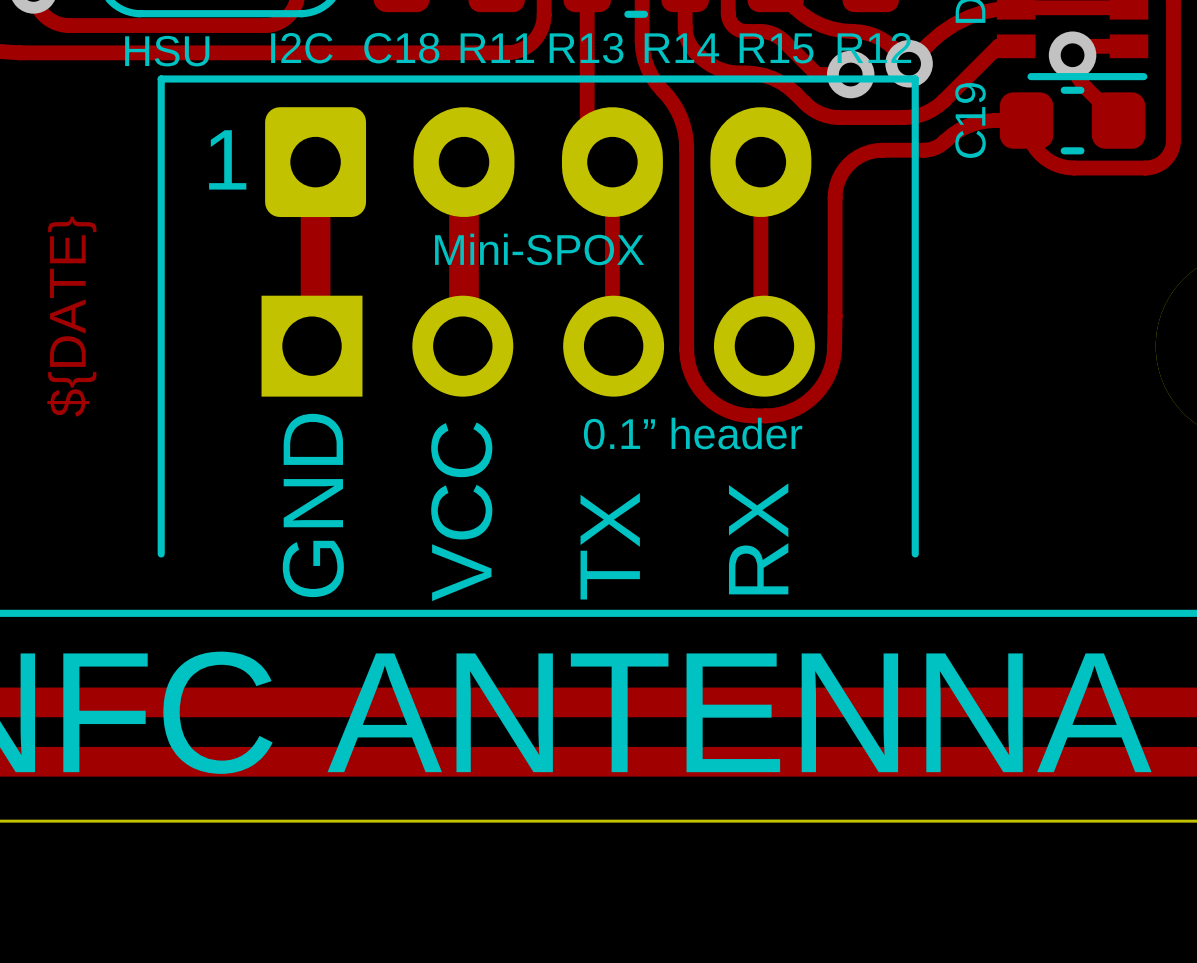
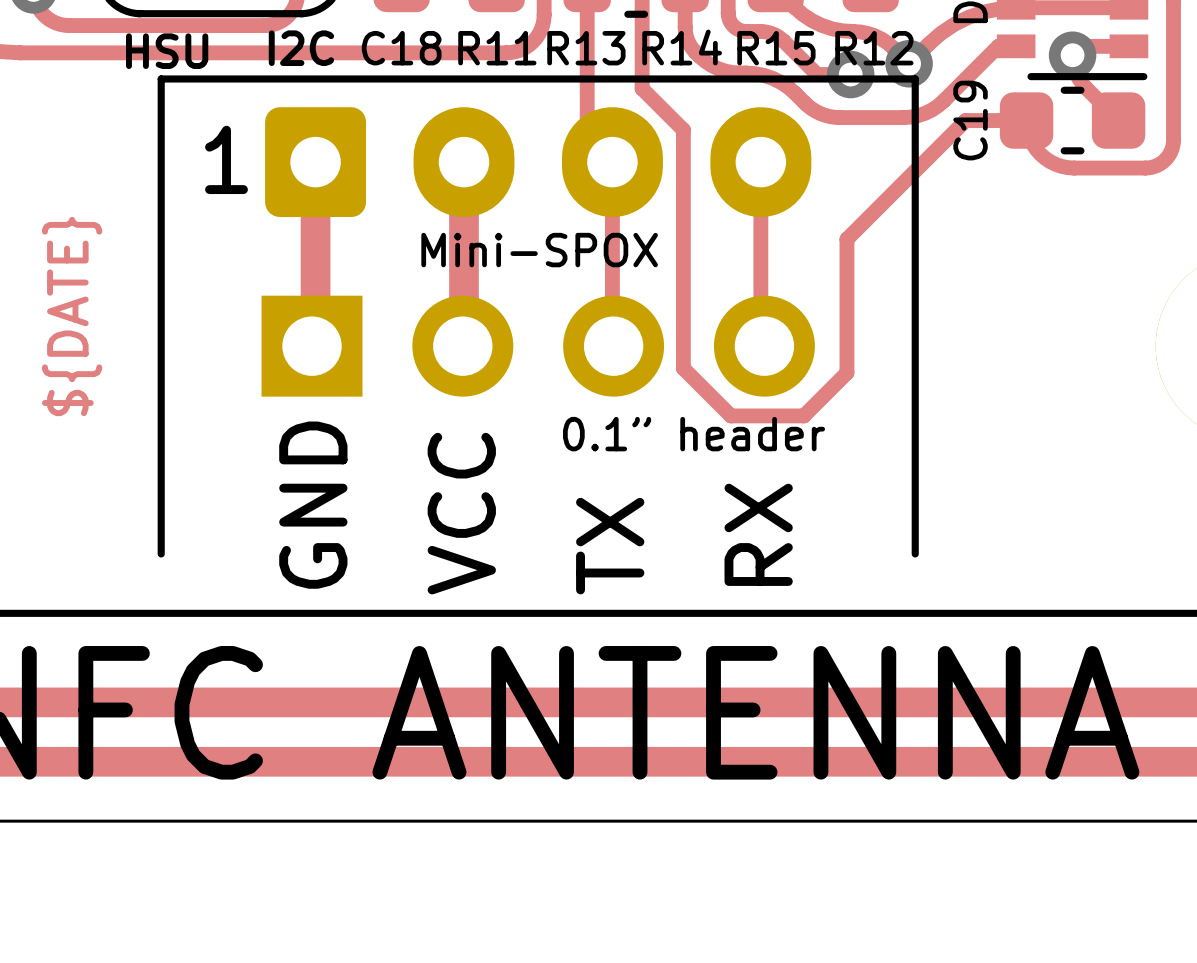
track: (642, 40) (647, 67) (656, 83) (677, 109) (683, 124) (686, 140) (686, 349) (688, 366) (700, 389) (712, 402) (736, 413) (753, 415) -> (642, 40) (642, 88) (683, 129) (683, 368) (730, 415) (753, 415)
track: (995, 120) (967, 125) (932, 148) (870, 151) (853, 160) (844, 168) (838, 179) (835, 191) (834, 346) (830, 369) (819, 389) (802, 405) (780, 414) (765, 415) -> (995, 120) (965, 120) (846, 239) (846, 372) (803, 415) (765, 415)

